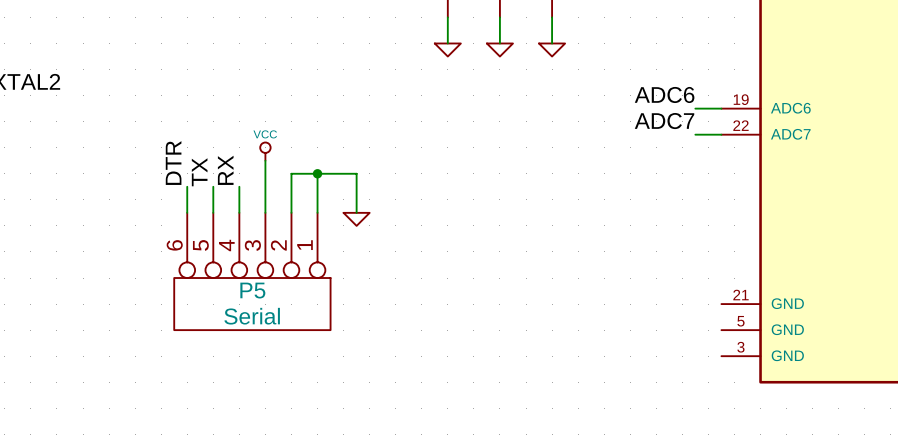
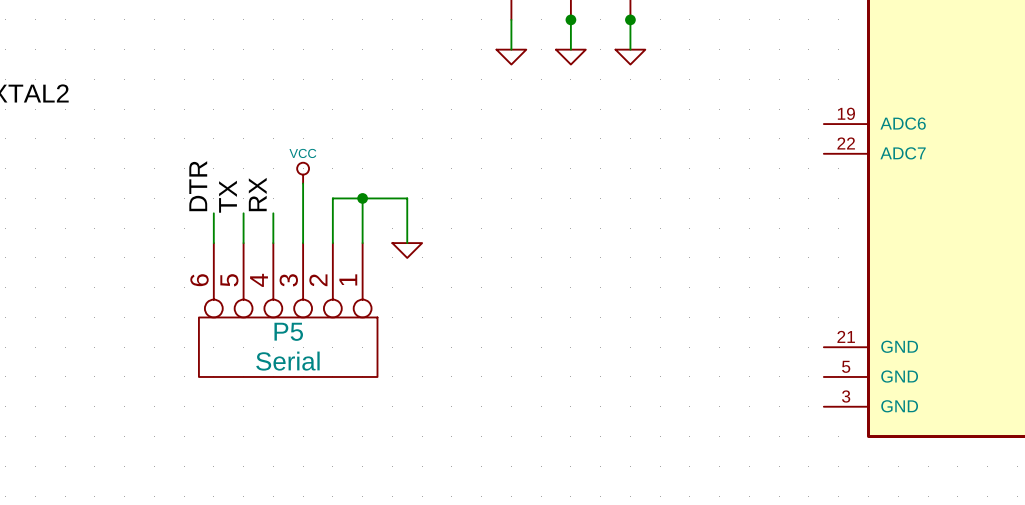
junction: none -> (570, 19)
junction: none -> (630, 19)
label: ADC6 (664, 94) -> none
wire: (695, 108) (721, 108) -> none
label: ADC7 (664, 121) -> none
wire: (695, 134) (721, 134) -> none

